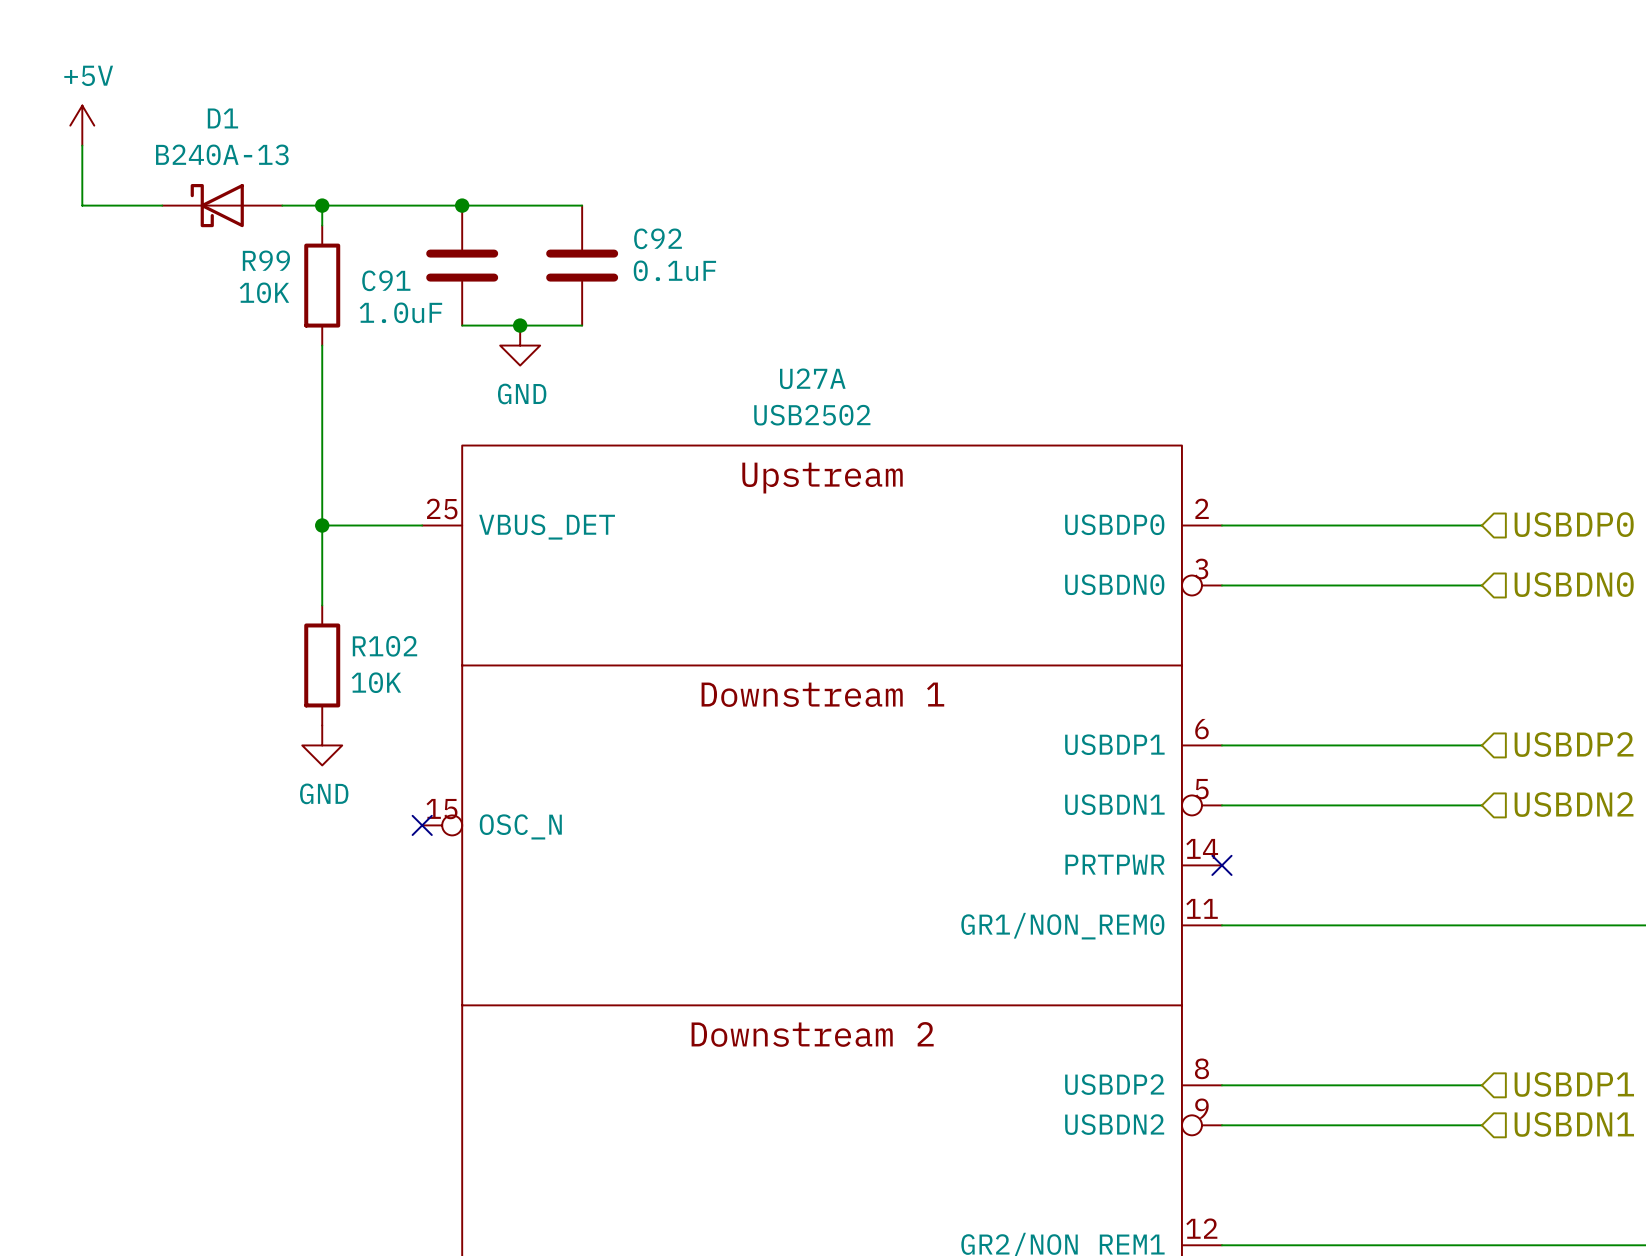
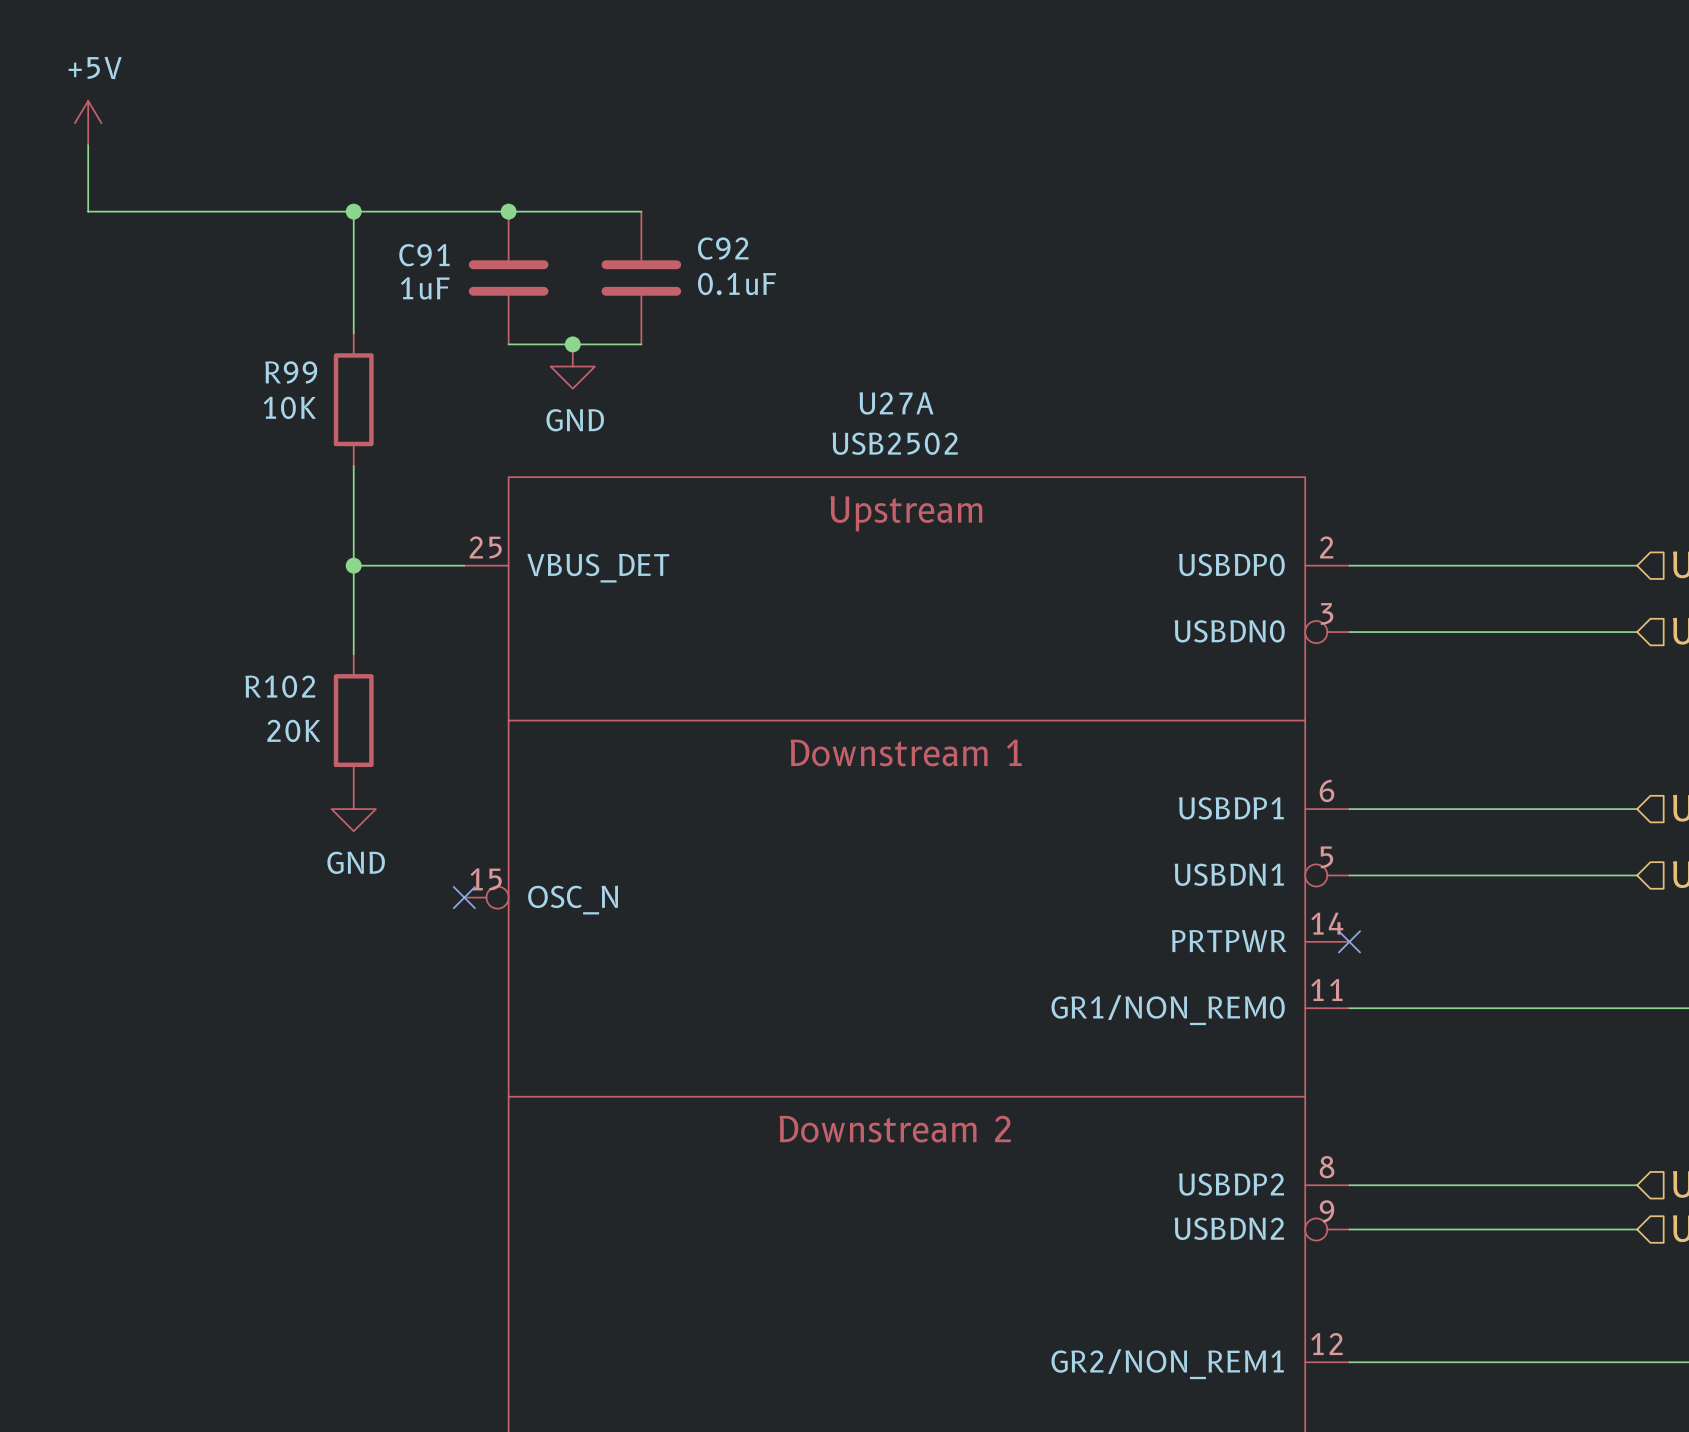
D1: B240A-13 (222, 205) -> none
C91 name position: C91 (386, 280) -> C91 (424, 255)
R99 position: (322, 285) -> (353, 399)
C91 value: 1.0uF (400, 312) -> 1uF (425, 288)
wire: (322, 345) (322, 435) -> (353, 233) (353, 333)
R102 name position: R102 (384, 646) -> R102 (280, 686)
R102 value: 10K (376, 682) -> 20K (293, 730)

